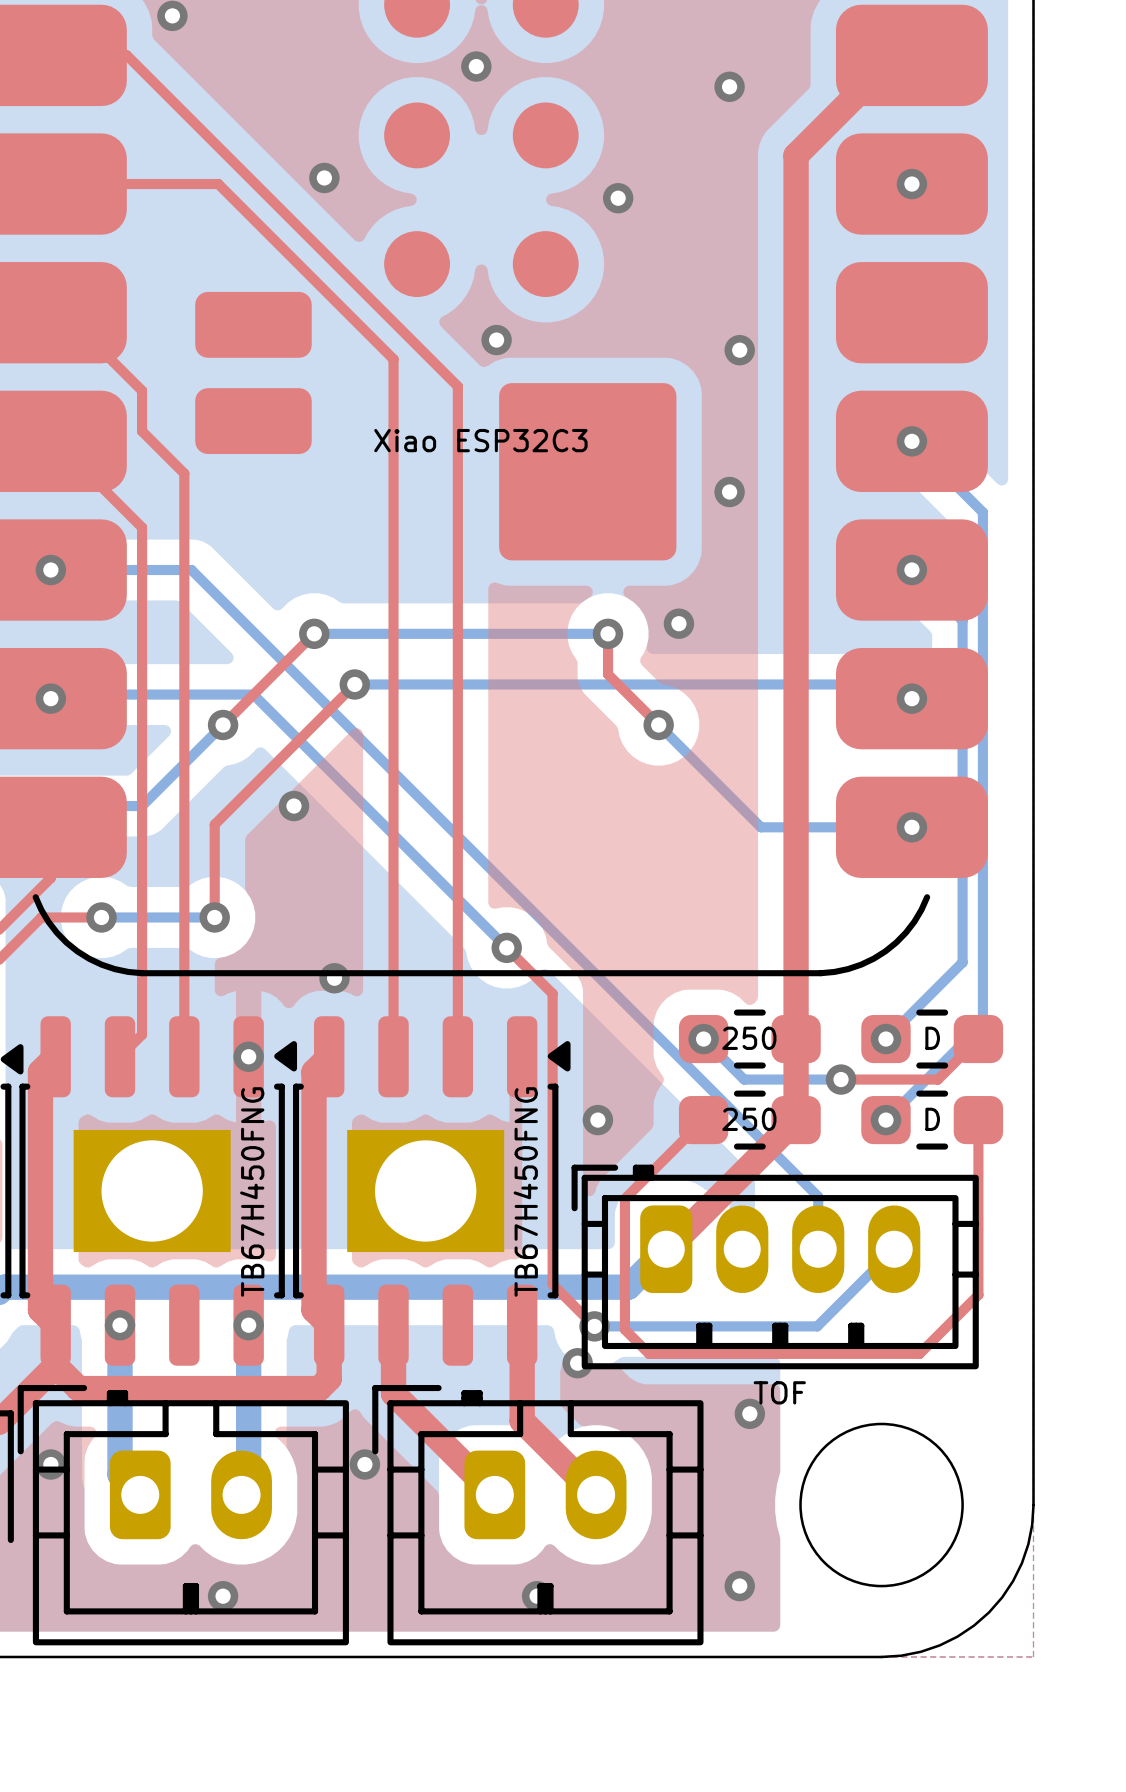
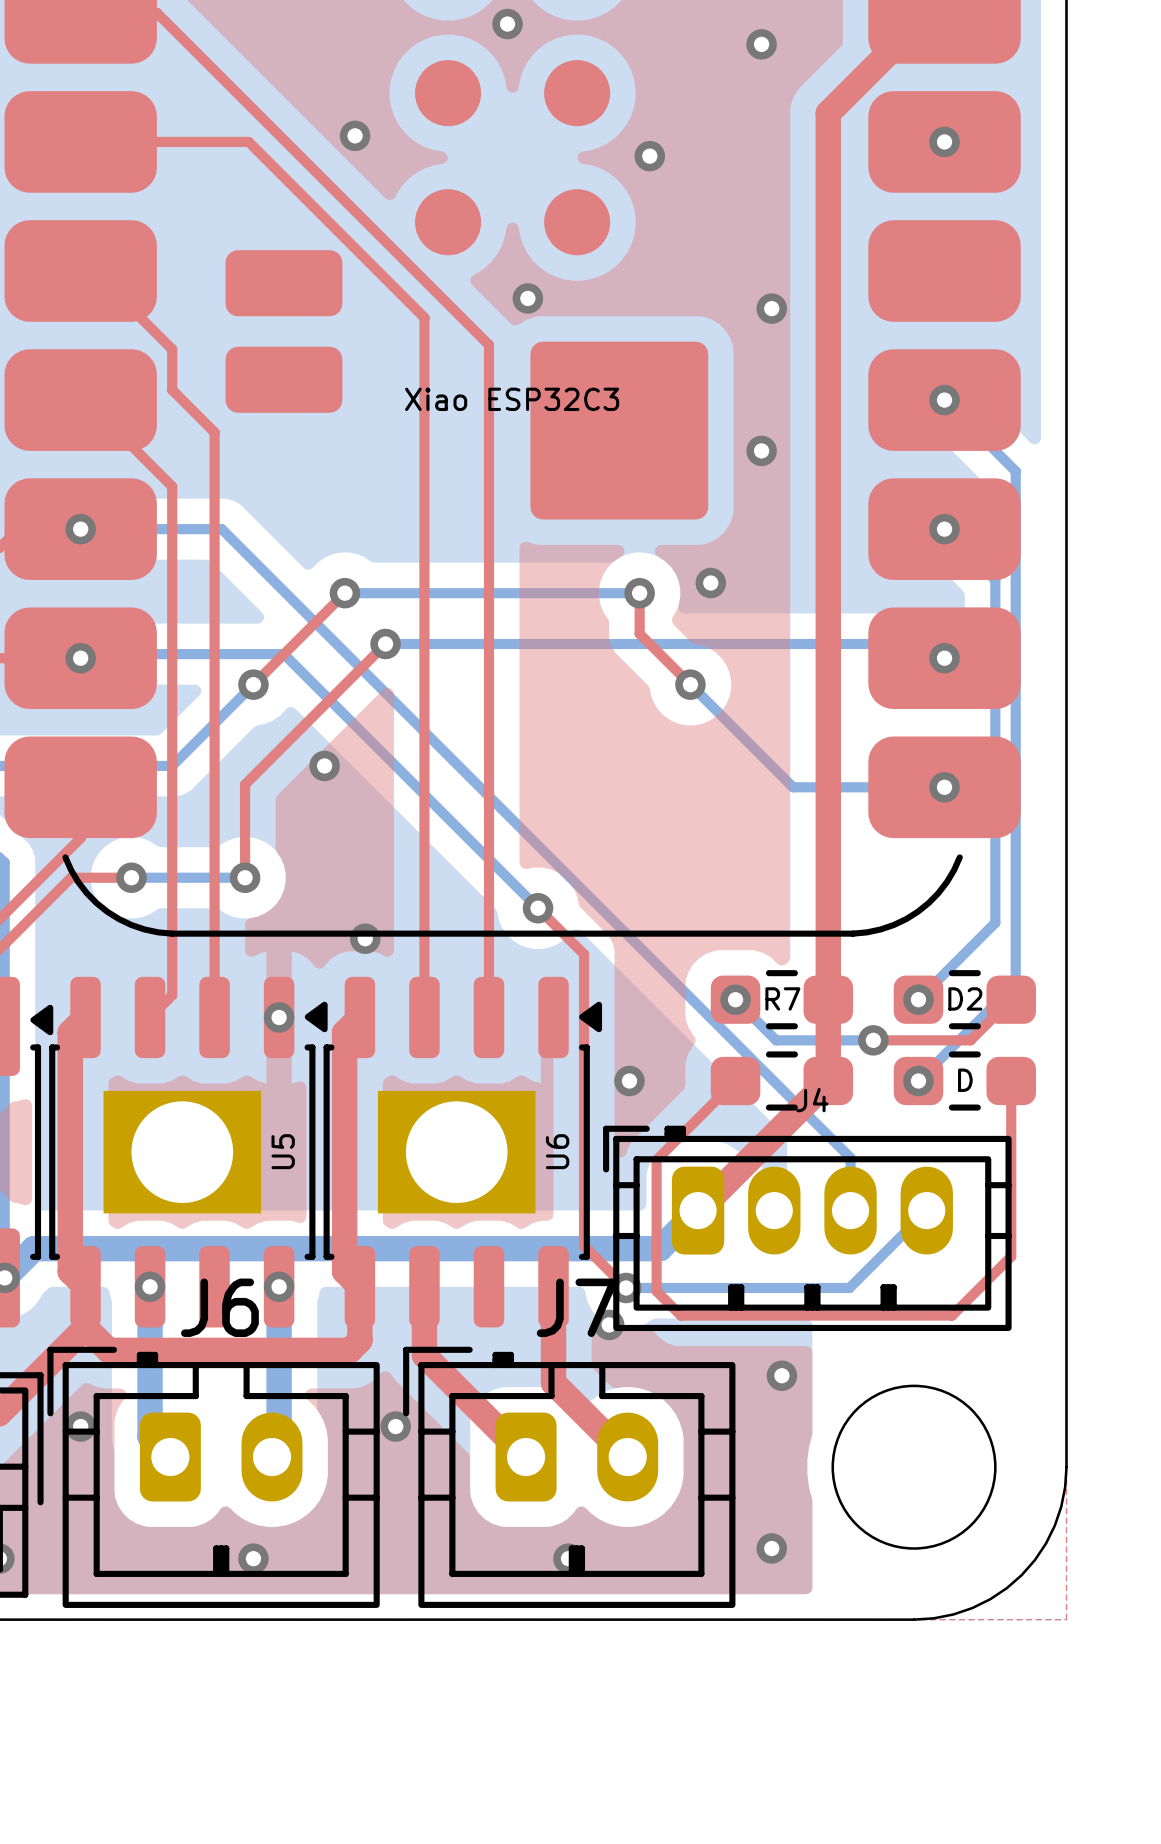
part text: 250 (749, 1038) -> none
R7 name: none -> R7 (782, 998)
D2 text: D (932, 1038) -> none
D2 name: none -> D2 (965, 998)
R7 text: 250 (749, 1119) -> none
J4 name: none -> J4 (812, 1100)
TB67H450FNG name: TB67H450FNG (252, 1191) -> U5 (283, 1151)
TB67H450FNG name: TB67H450FNG (525, 1191) -> U6 (557, 1151)
J6 name: none -> J6 (219, 1307)
J7 name: none -> J7 (576, 1307)
J4 text: TOF (779, 1392) -> none

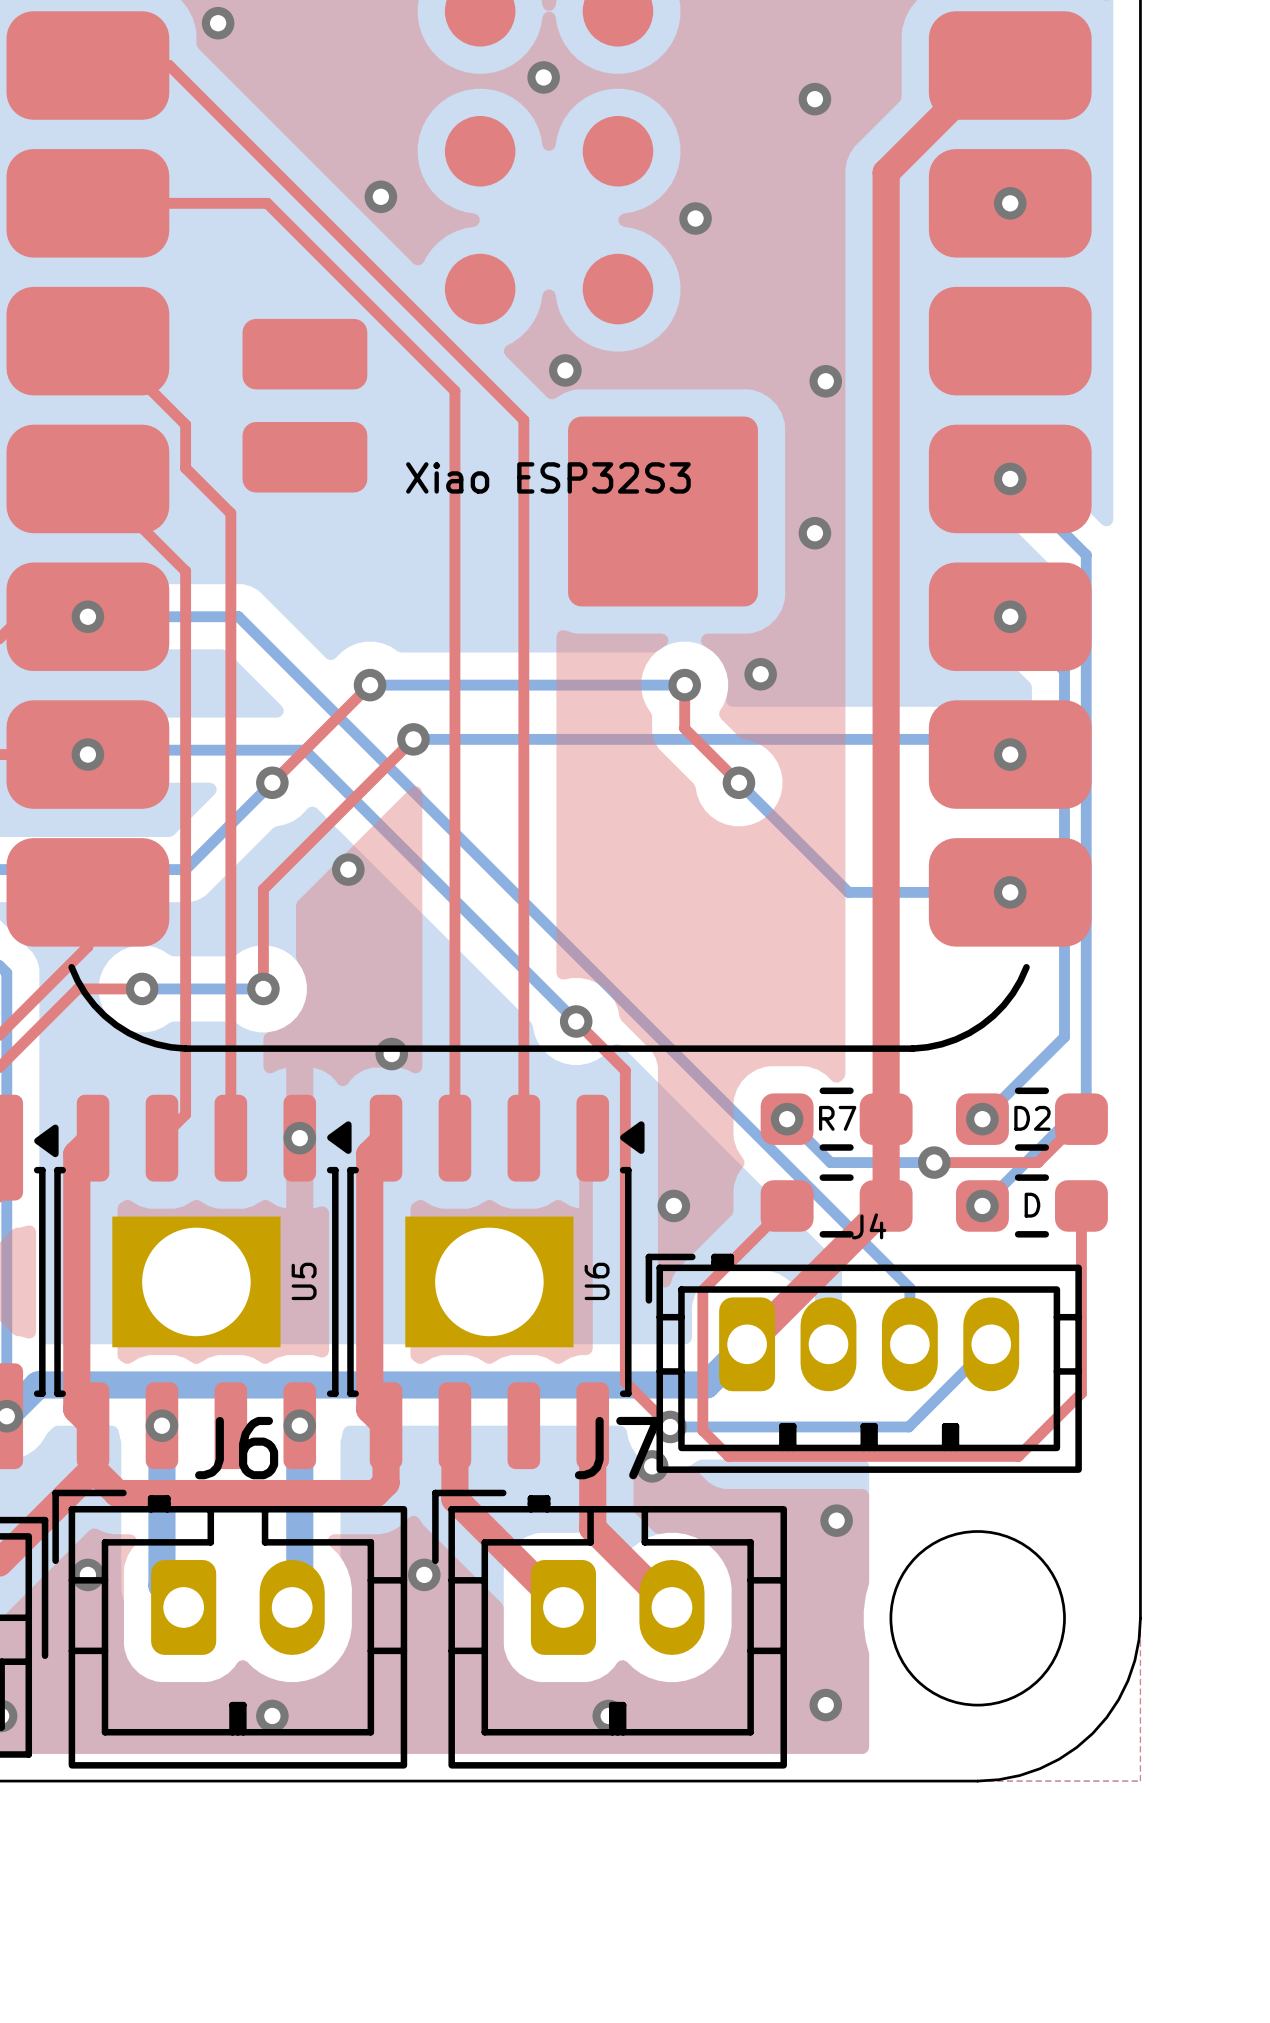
part value: Xiao ESP32C3 (512, 399) -> Xiao ESP32S3 (548, 477)

